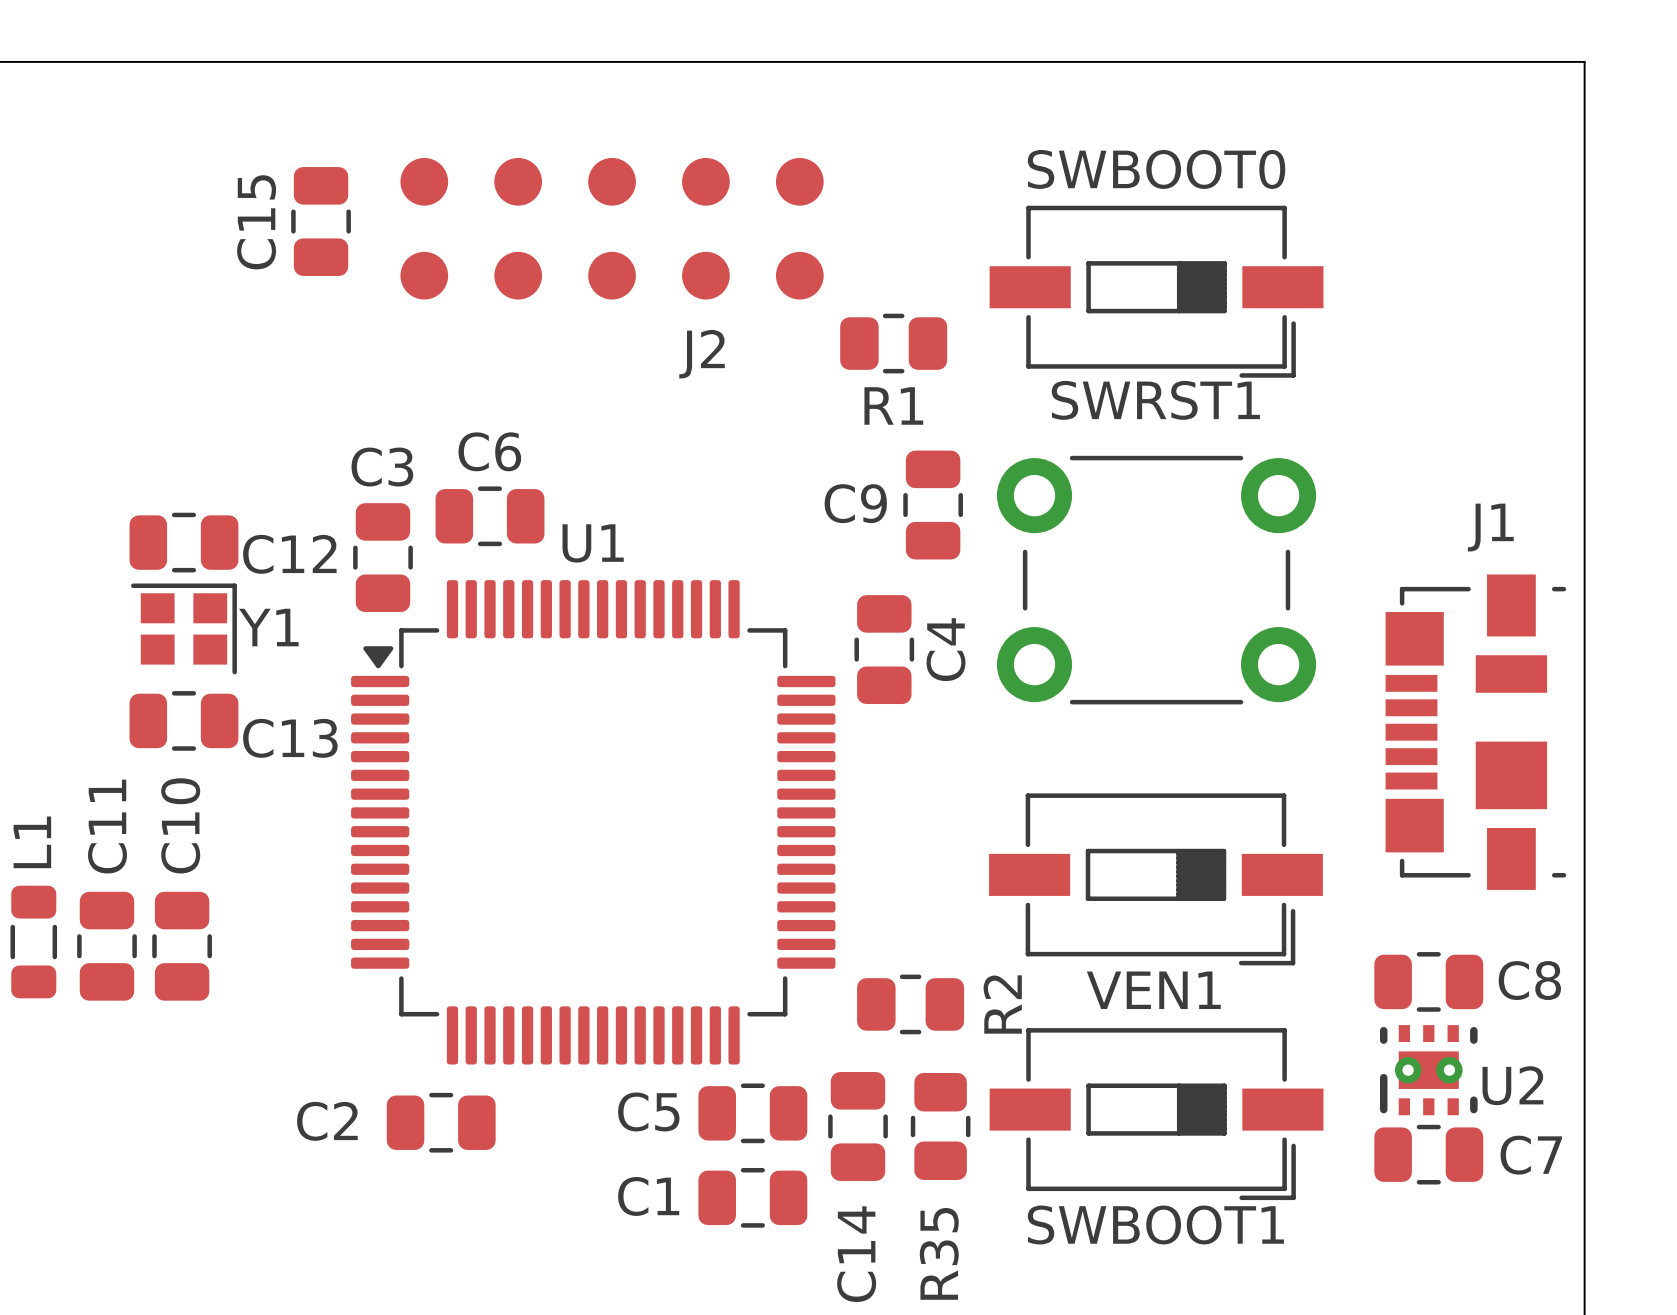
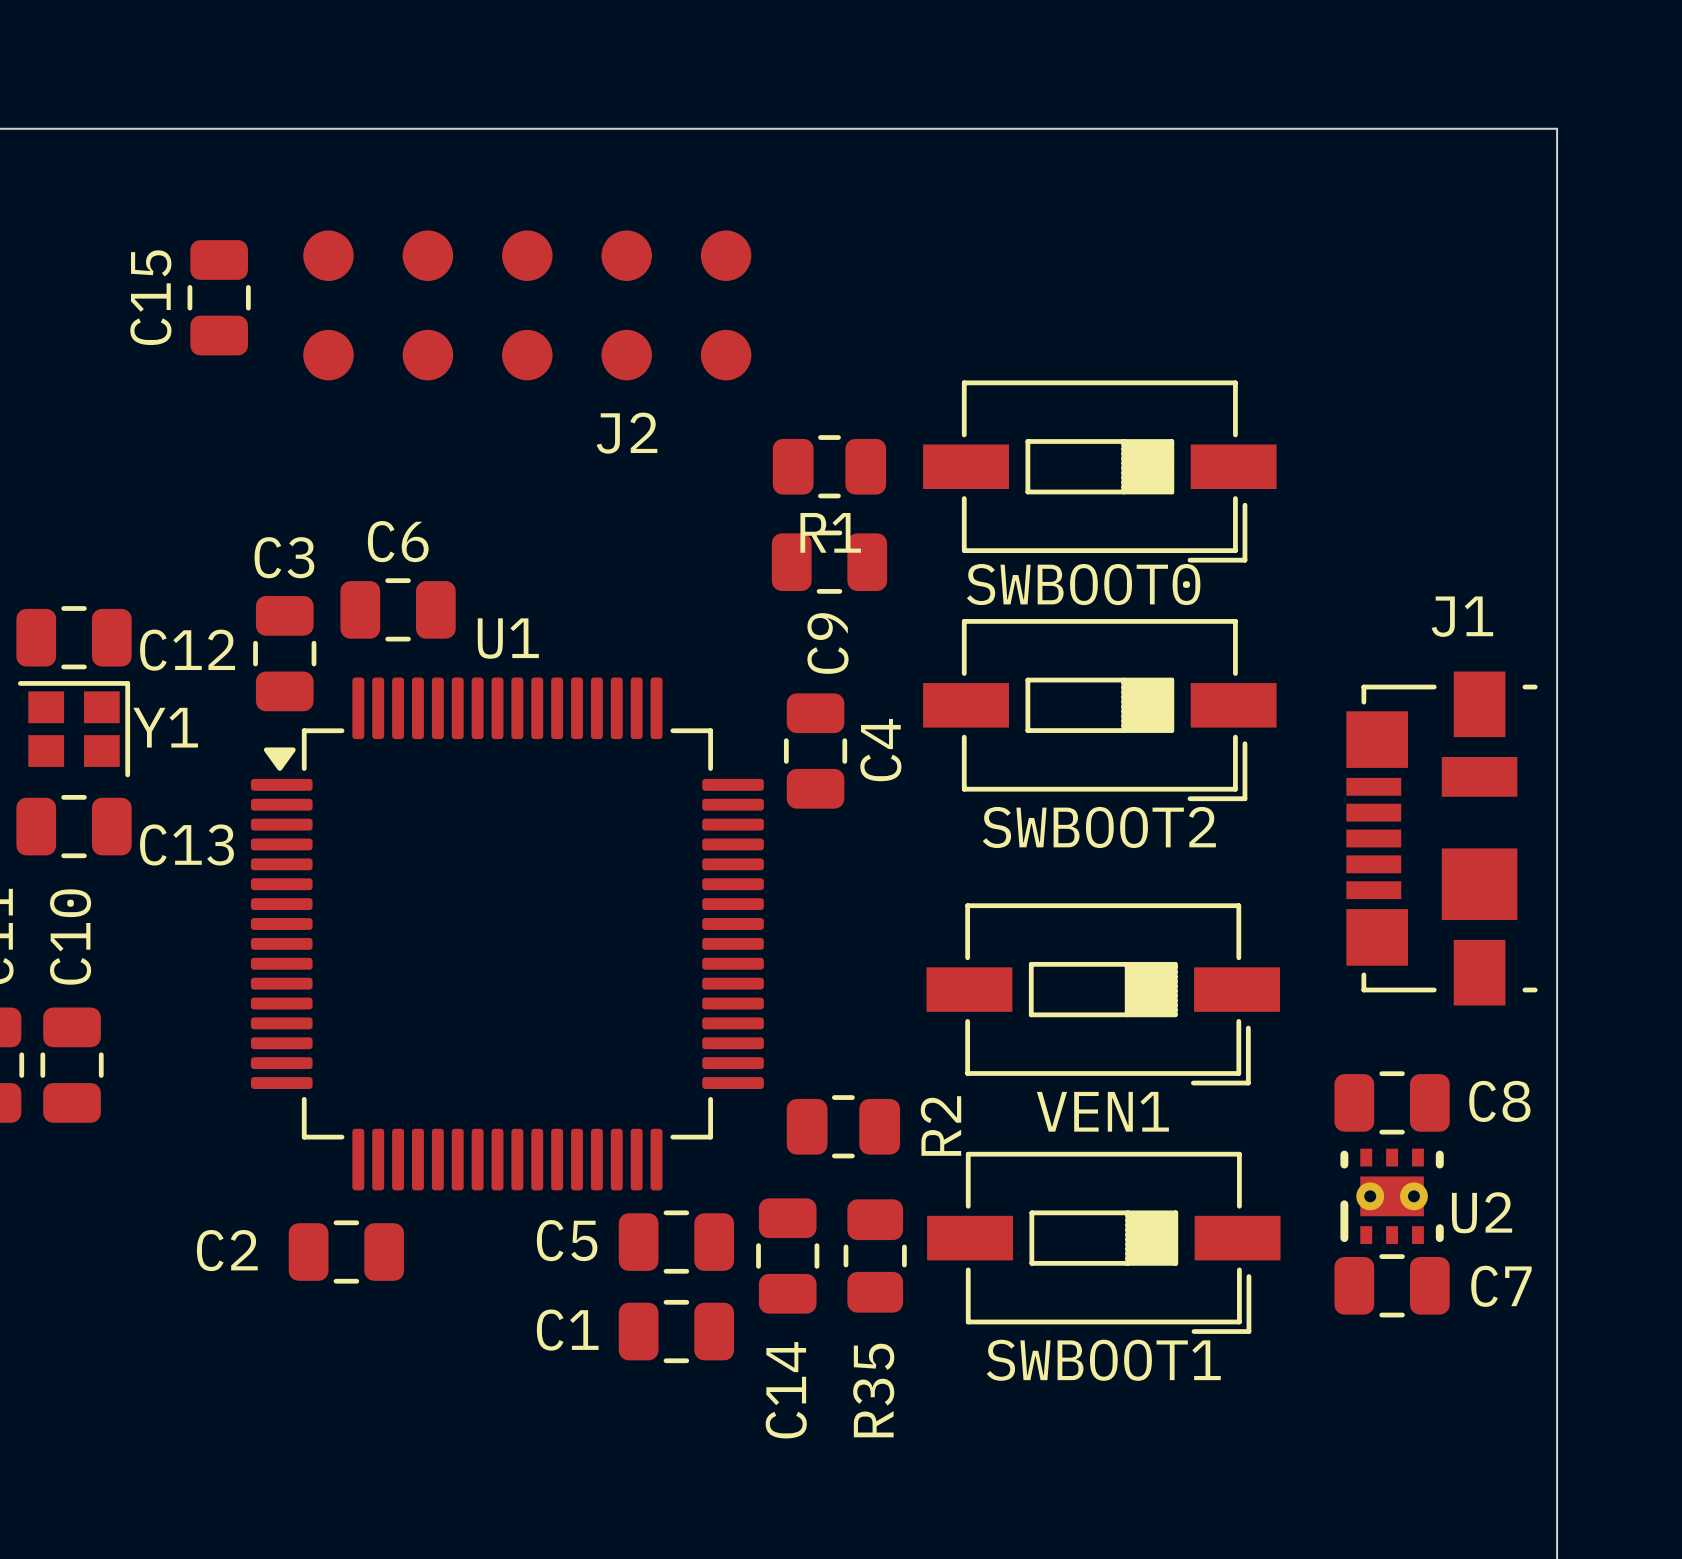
SWBOOT0 name position: SWBOOT0 (1156, 169) -> SWBOOT0 (1083, 584)
SWBOOT0 position: (1156, 291) -> (1099, 471)
R1 position: (893, 343) -> (829, 466)
C9 name position: C9 (855, 503) -> C9 (827, 643)
C9 rotation: 0° (933, 505) -> 90° clockwise (829, 562)
SWRST1: (1156, 580) -> none
SWBOOT2: none -> (1099, 710)

